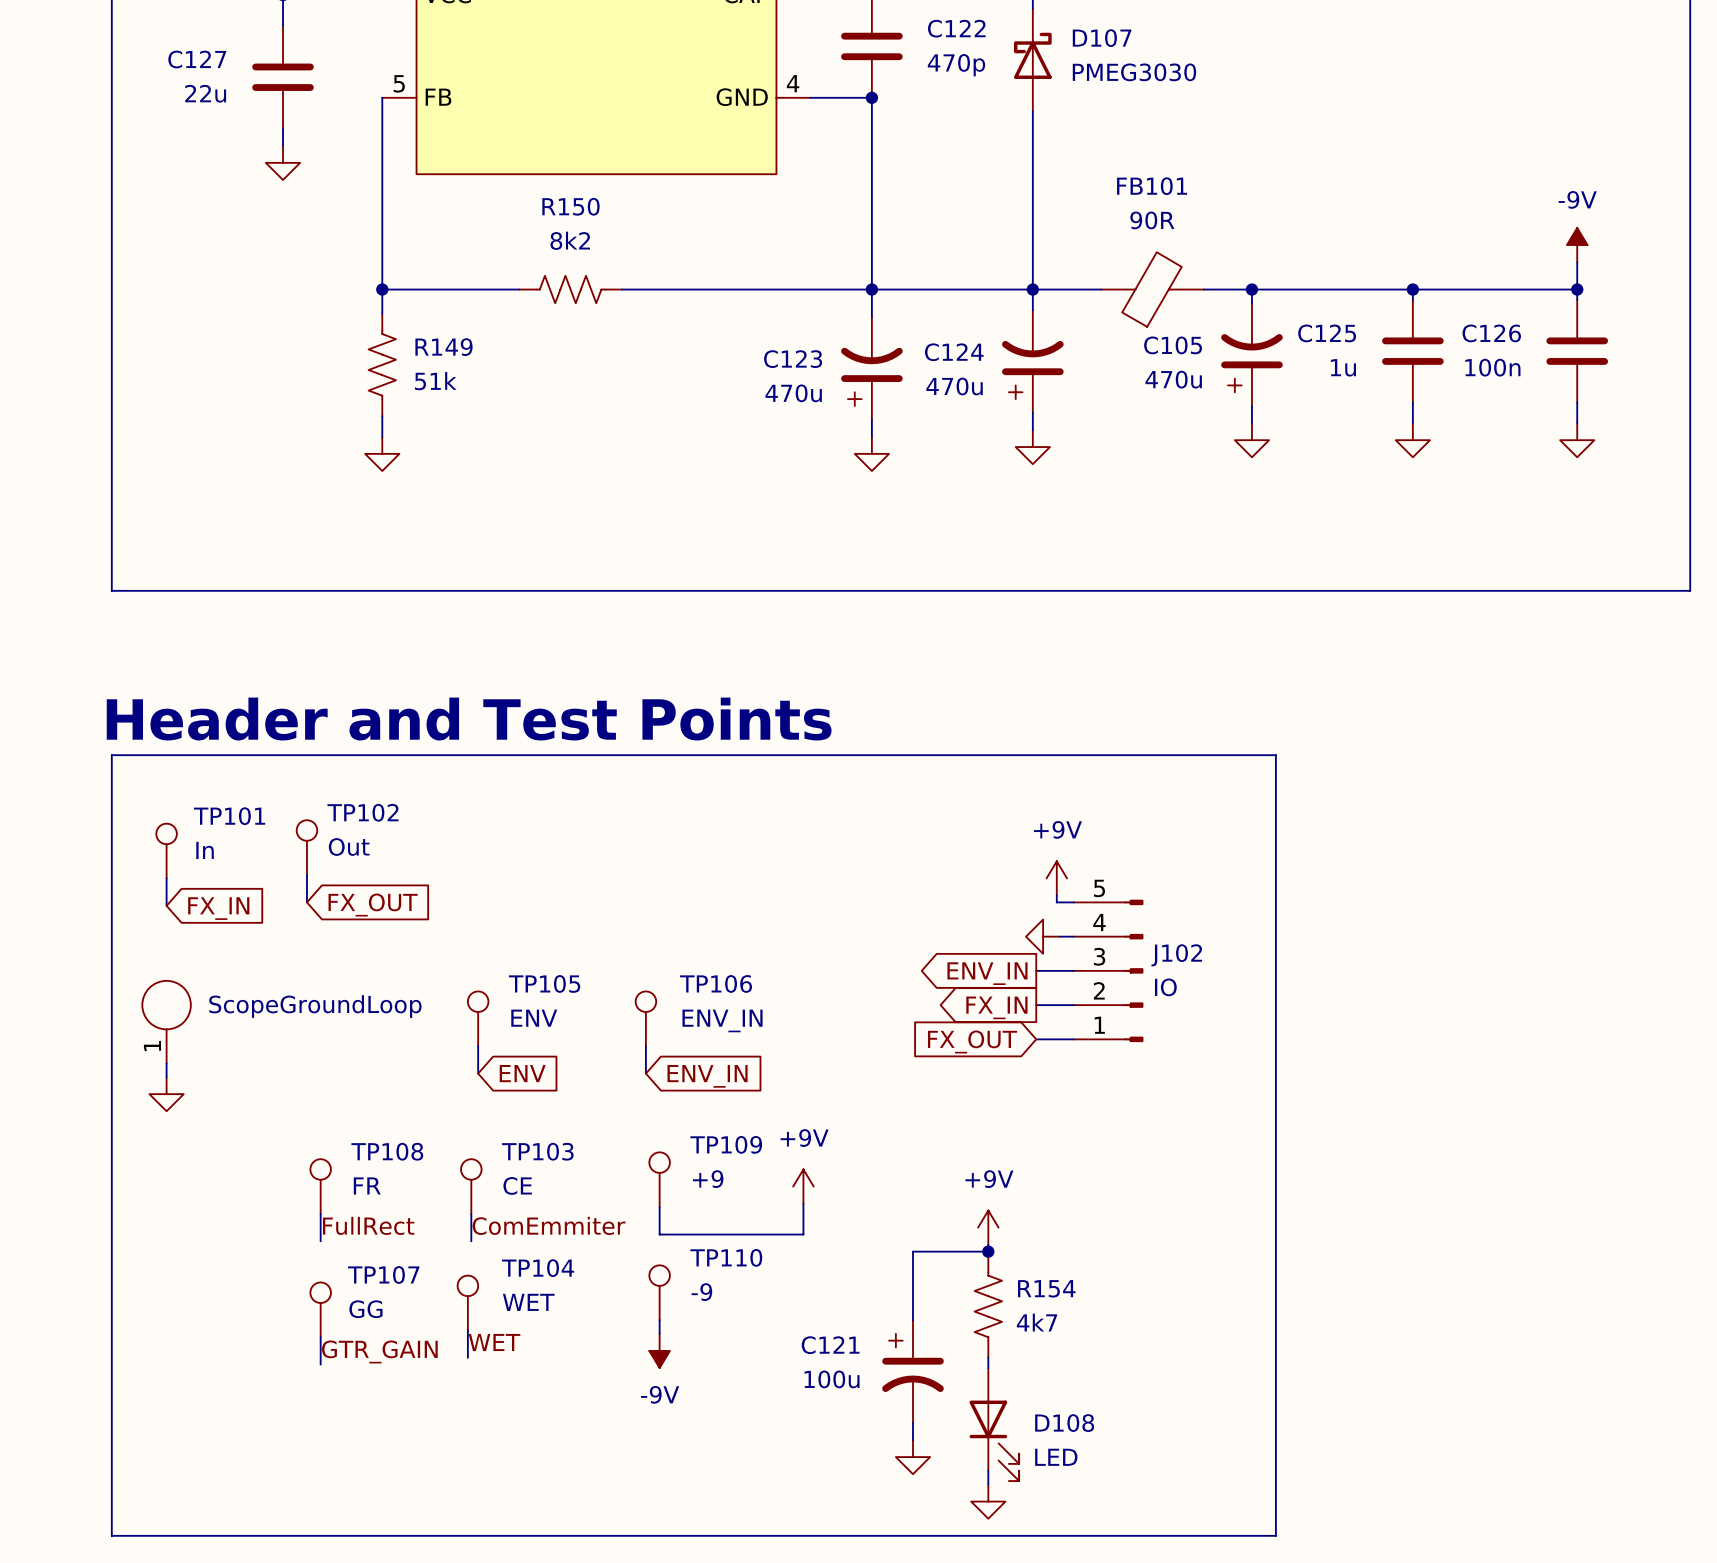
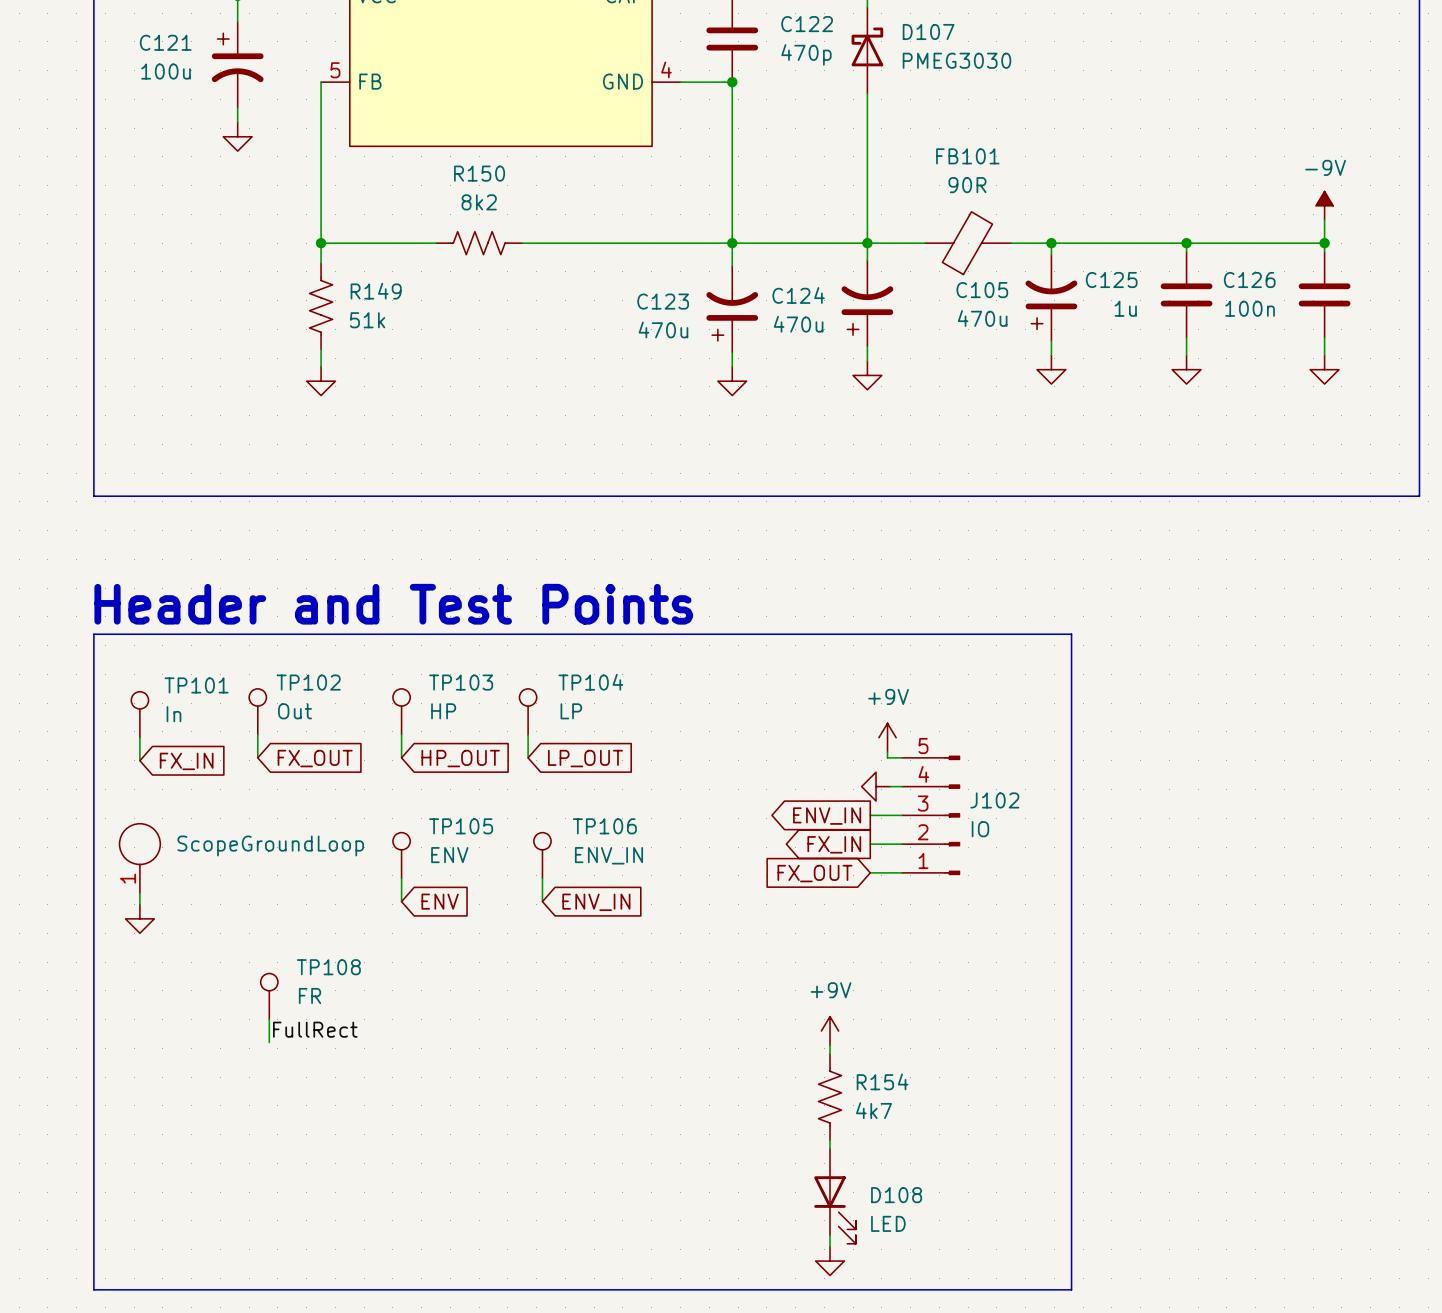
C127: 22u (283, 77) -> none
wire: none -> (401, 734) (401, 757)
wire: none -> (528, 734) (528, 757)
global label: none -> HP_OUT (460, 758)
global label: none -> LP_OUT (585, 758)
TP109: +9 (659, 1179) -> none
TP103 value: CE (517, 1185) -> HP (443, 711)
TP103 position: (471, 1186) -> (401, 711)
power symbol: +9V (803, 1186) -> none
wire: (803, 1203) (803, 1234) (659, 1234) (659, 1207) -> none
wire: (471, 1213) (471, 1241) -> none
label: ComEmmiter (549, 1225) -> none
wire: (988, 1251) (912, 1251) (912, 1320) -> none
junction: (988, 1251) -> none
TP110: -9 (659, 1292) -> none
TP104 value: WET (528, 1302) -> LP (571, 711)
TP104 position: (467, 1303) -> (528, 711)
TP107: GG (320, 1309) -> none
wire: (659, 1320) (659, 1333) -> none
wire: (467, 1330) (467, 1357) -> none
wire: (320, 1337) (320, 1364) -> none
label: WET (494, 1342) -> none
power symbol: -9V (659, 1350) -> none
label: GTR_GAIN (379, 1351) -> none
C121 position: (912, 1371) -> (237, 64)
wire: (912, 1422) (912, 1439) -> none
power symbol: (912, 1457) -> none

